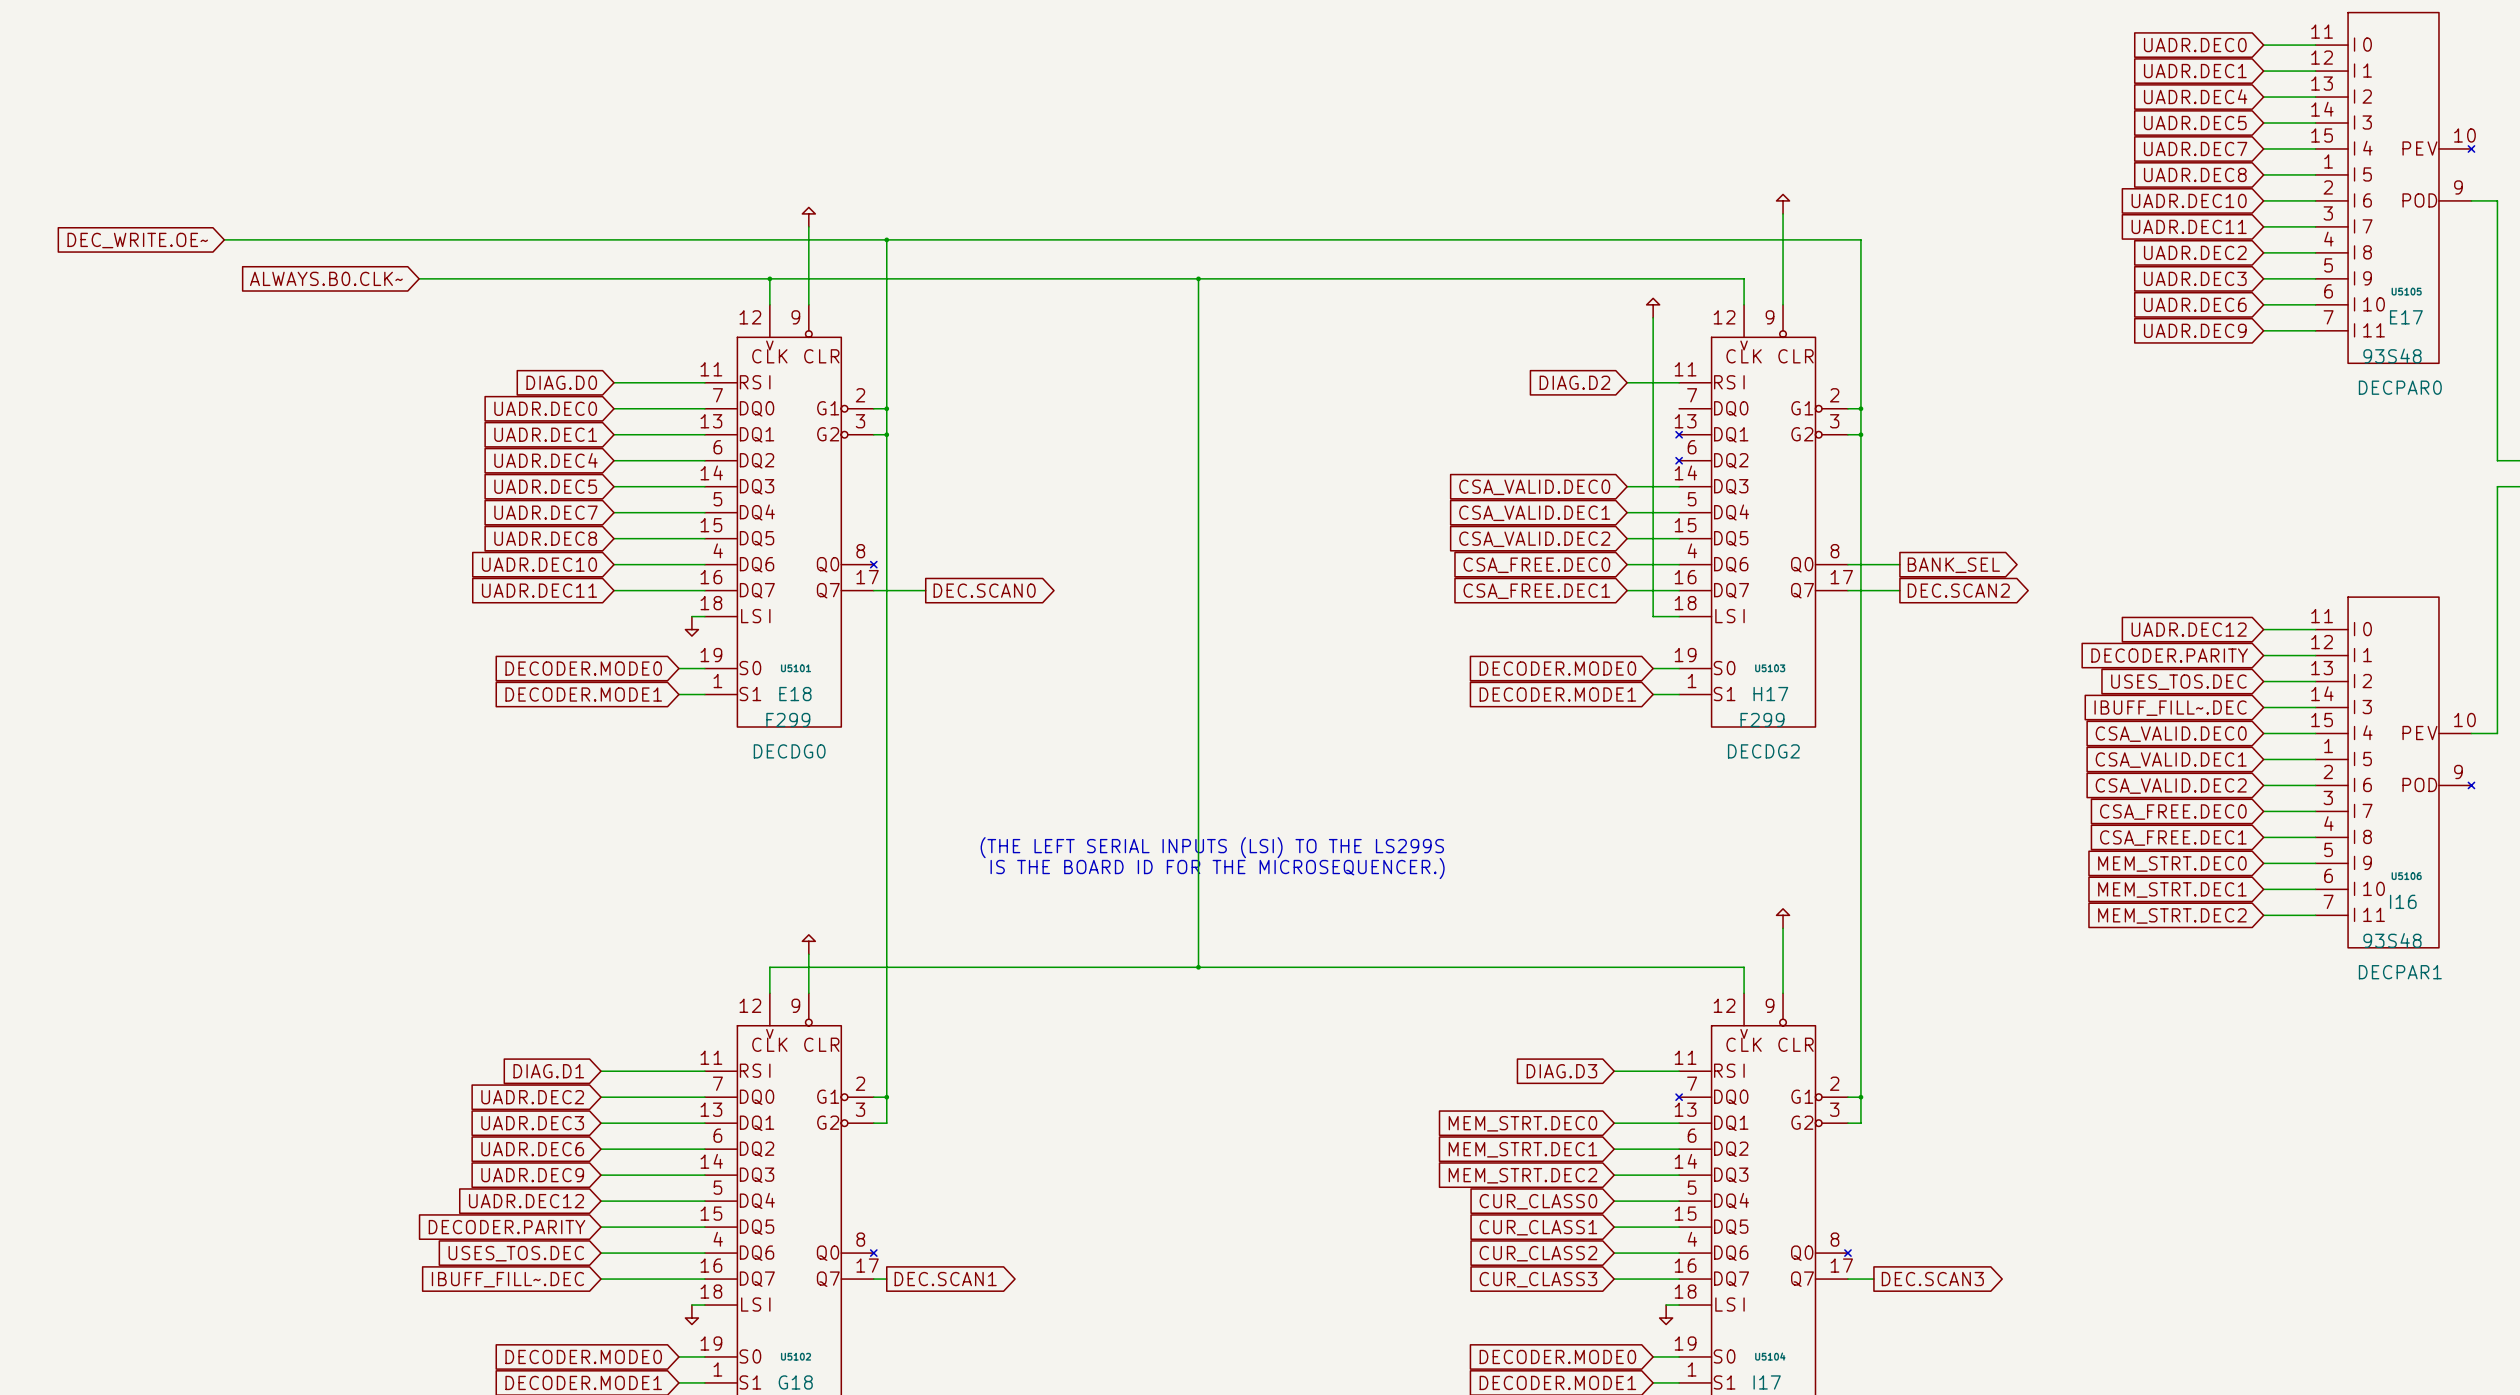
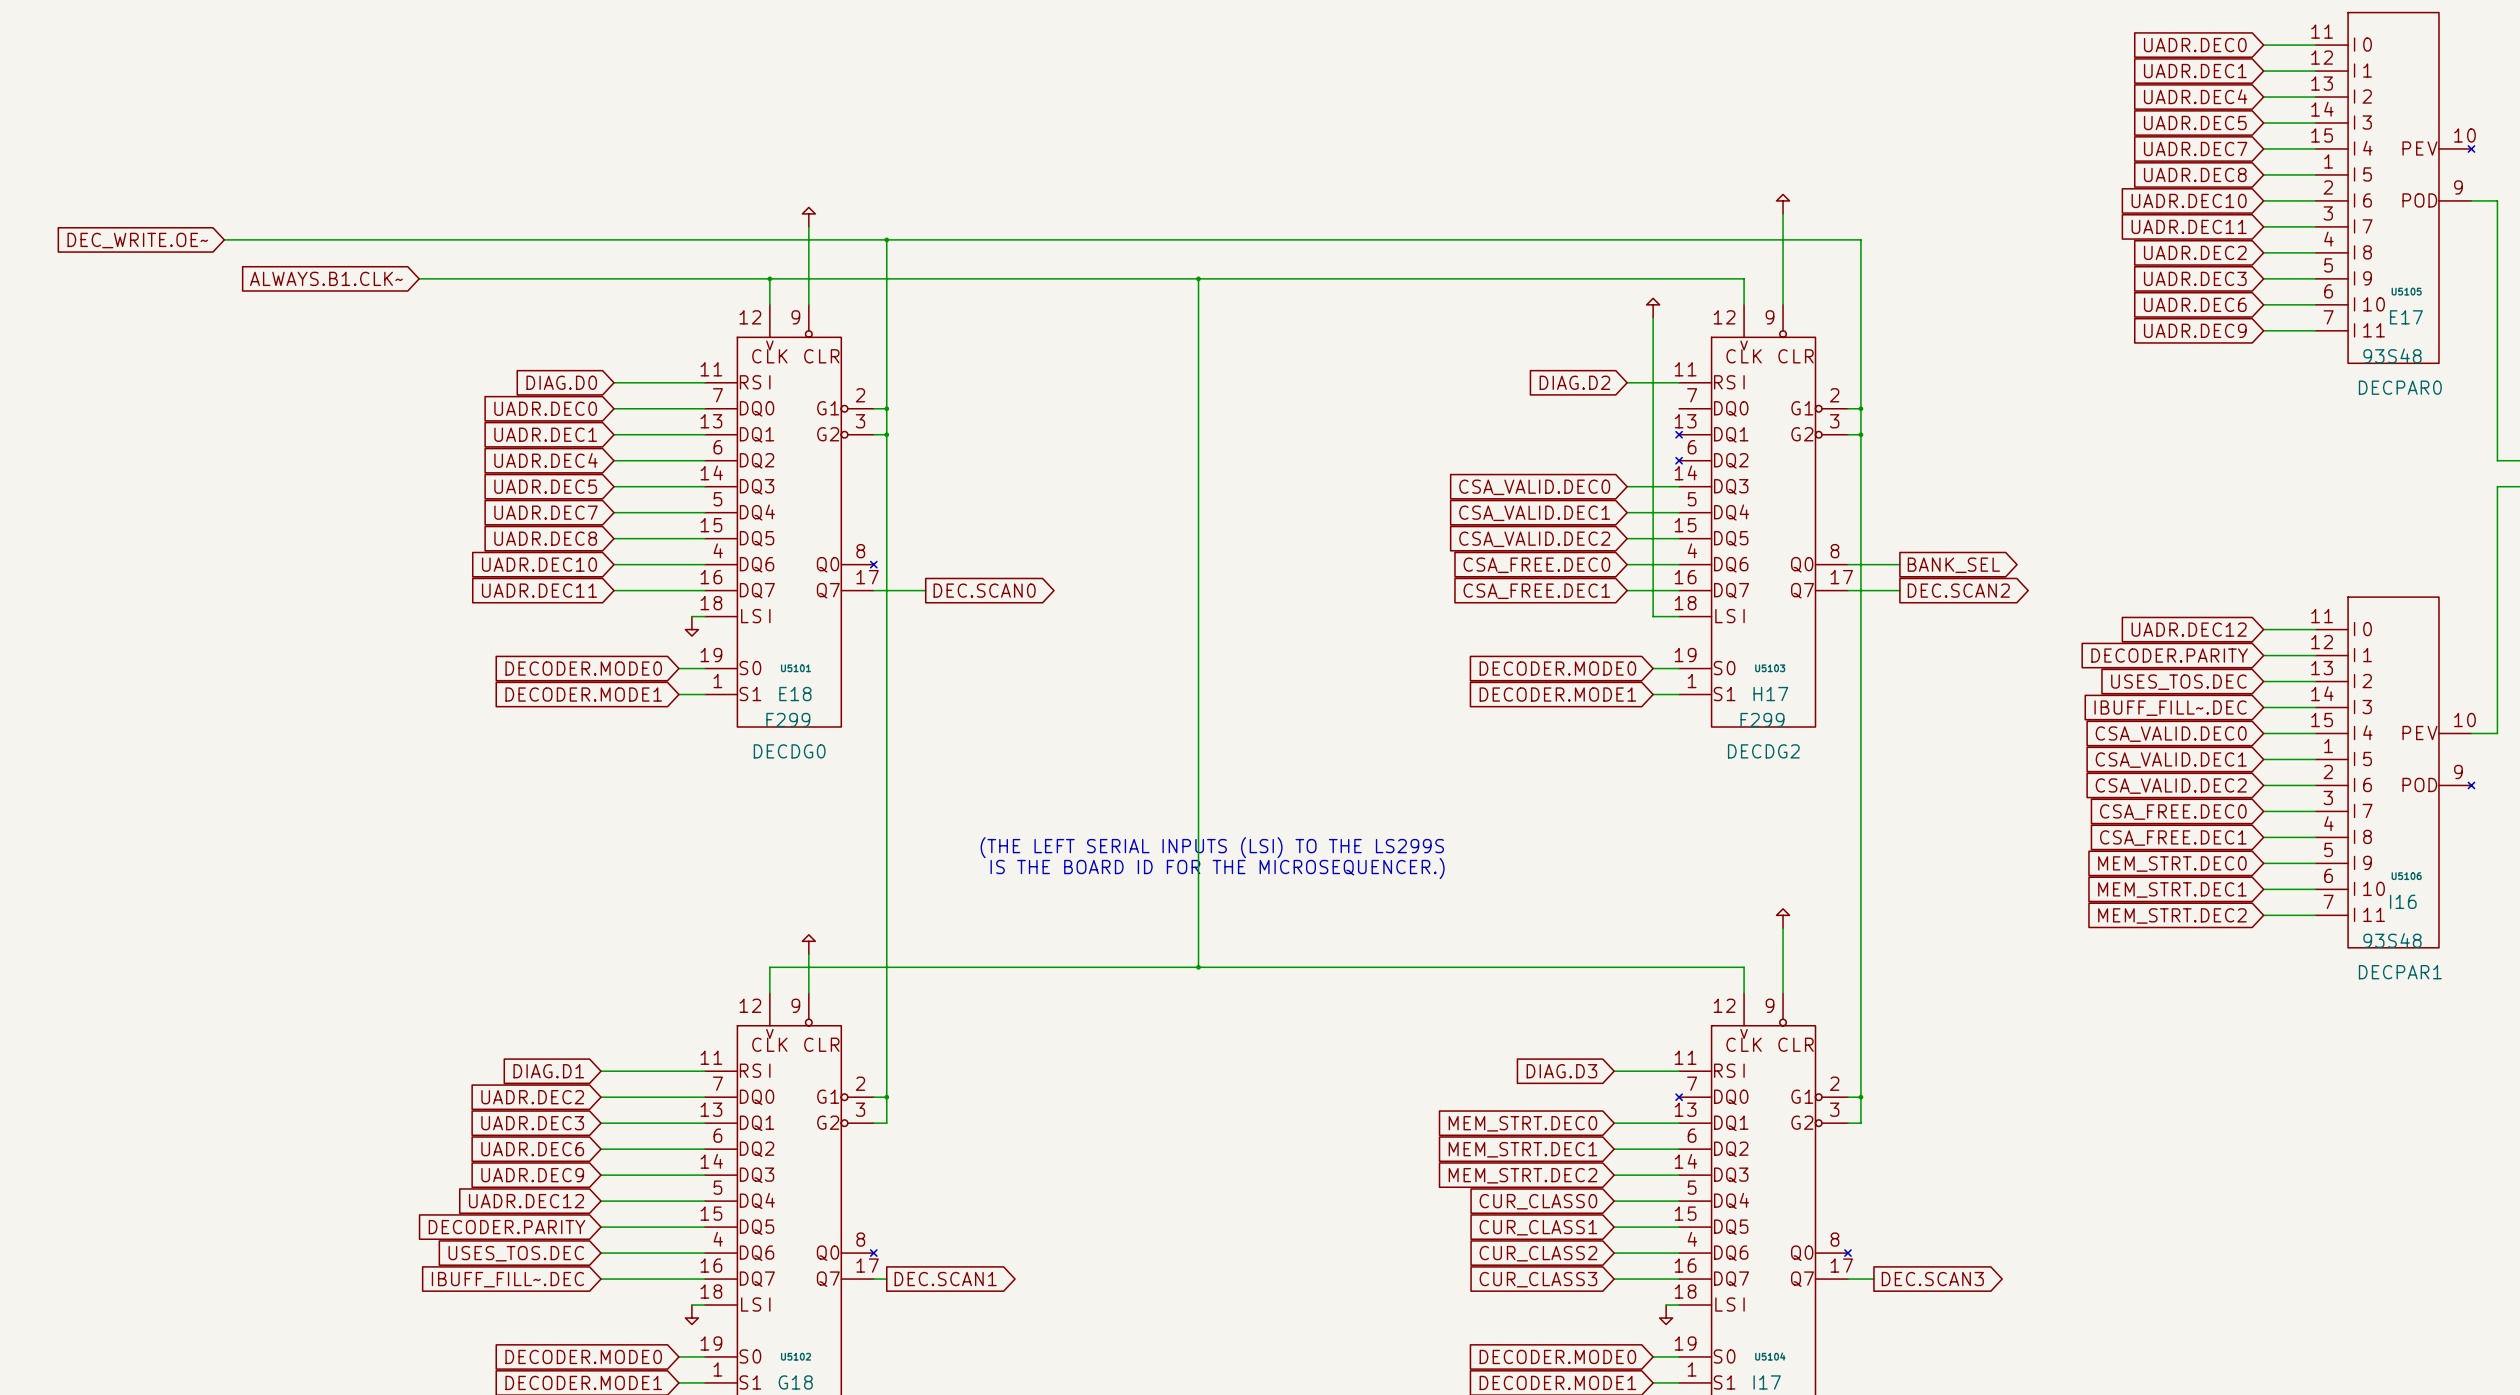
global label: ALWAYS.B0.CLK~ (326, 278) -> ALWAYS.B1.CLK~ (326, 278)

